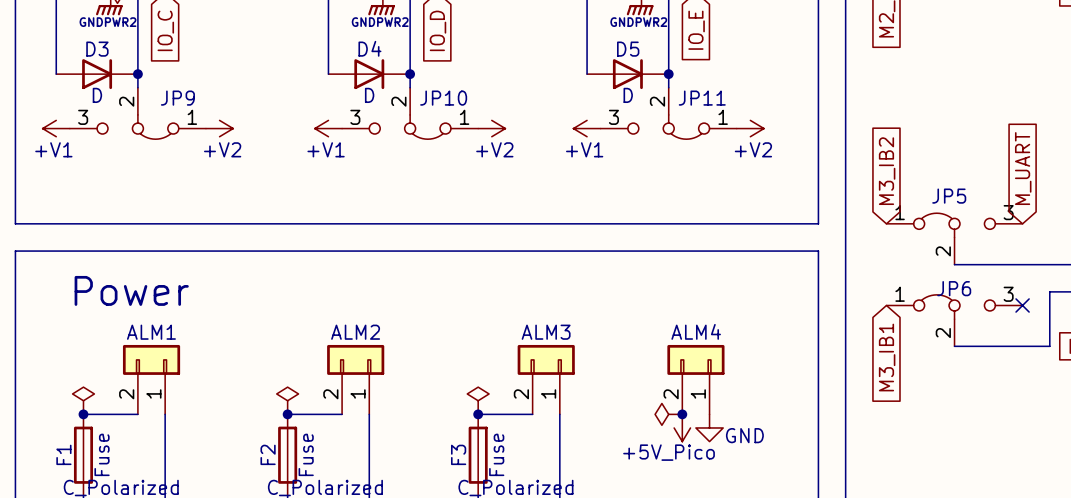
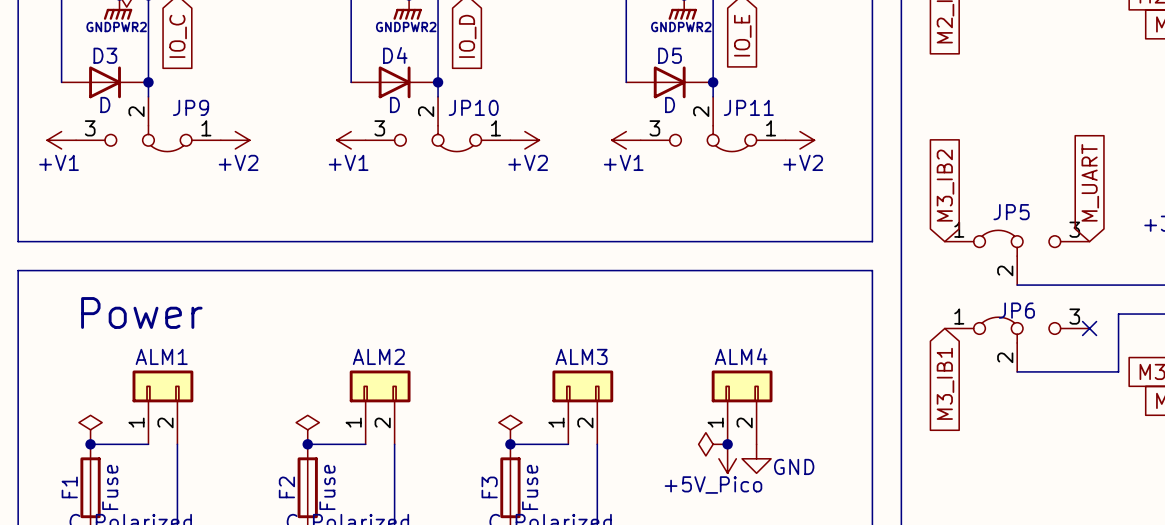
ALM1 flip: as is (151, 359) -> left-right (162, 386)
ALM2 flip: as is (355, 359) -> left-right (380, 386)
ALM3 flip: as is (546, 359) -> left-right (582, 386)
ALM4 flip: as is (695, 359) -> left-right (742, 386)

